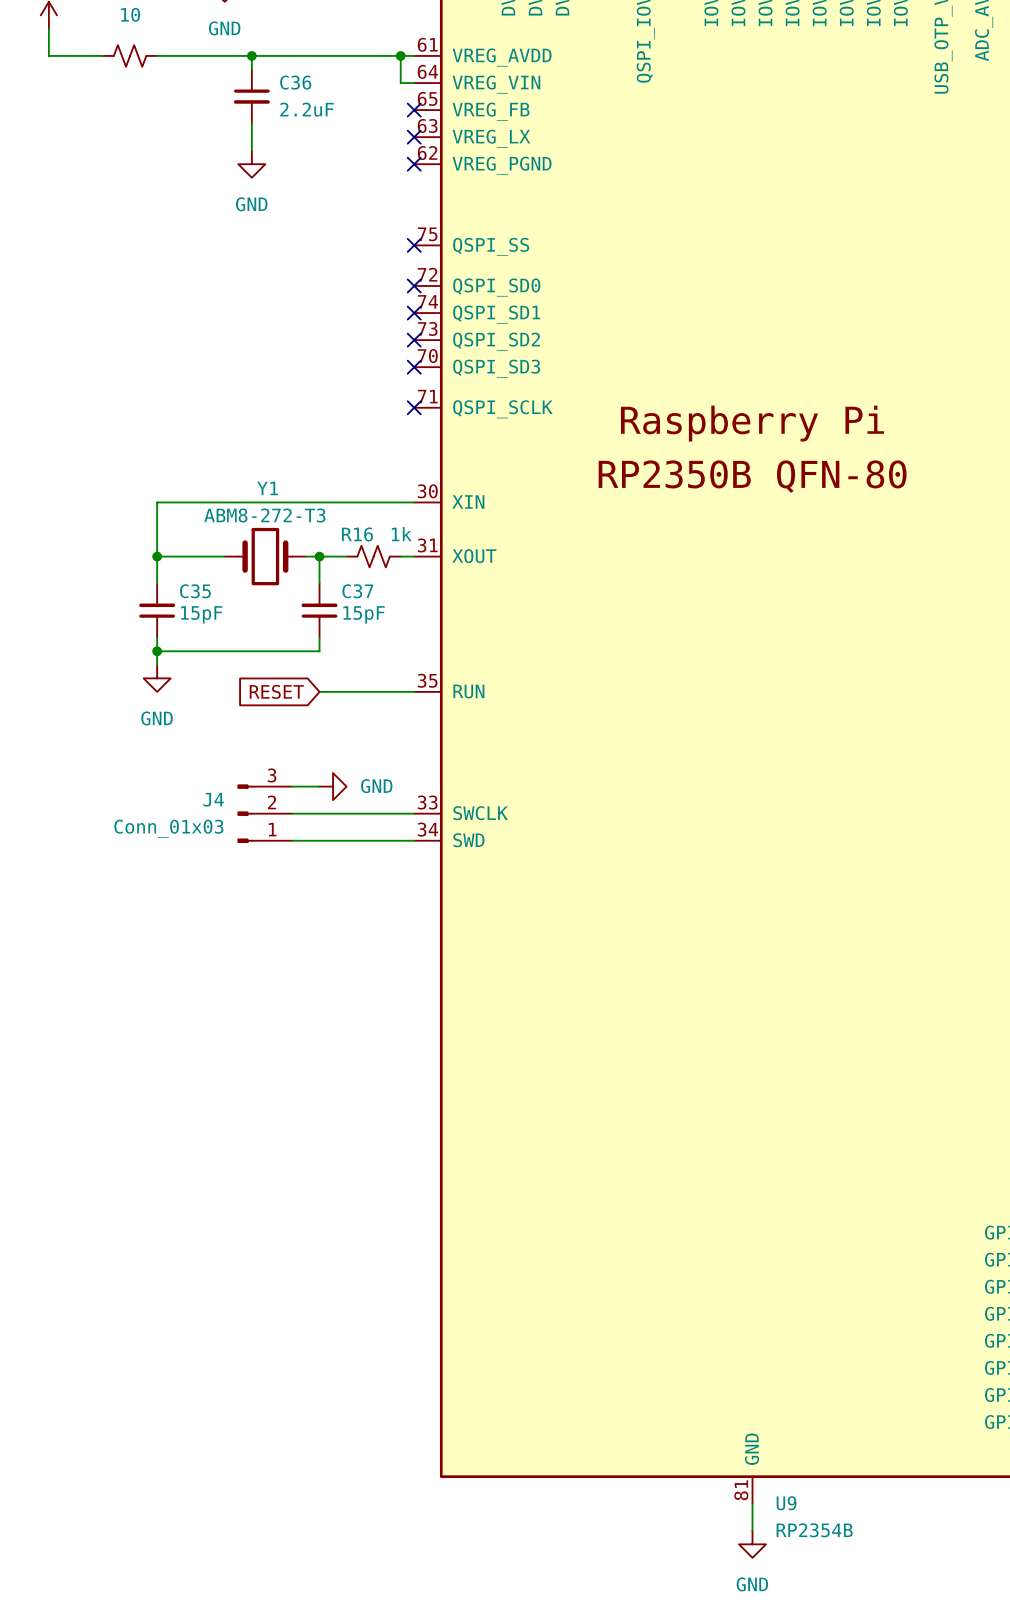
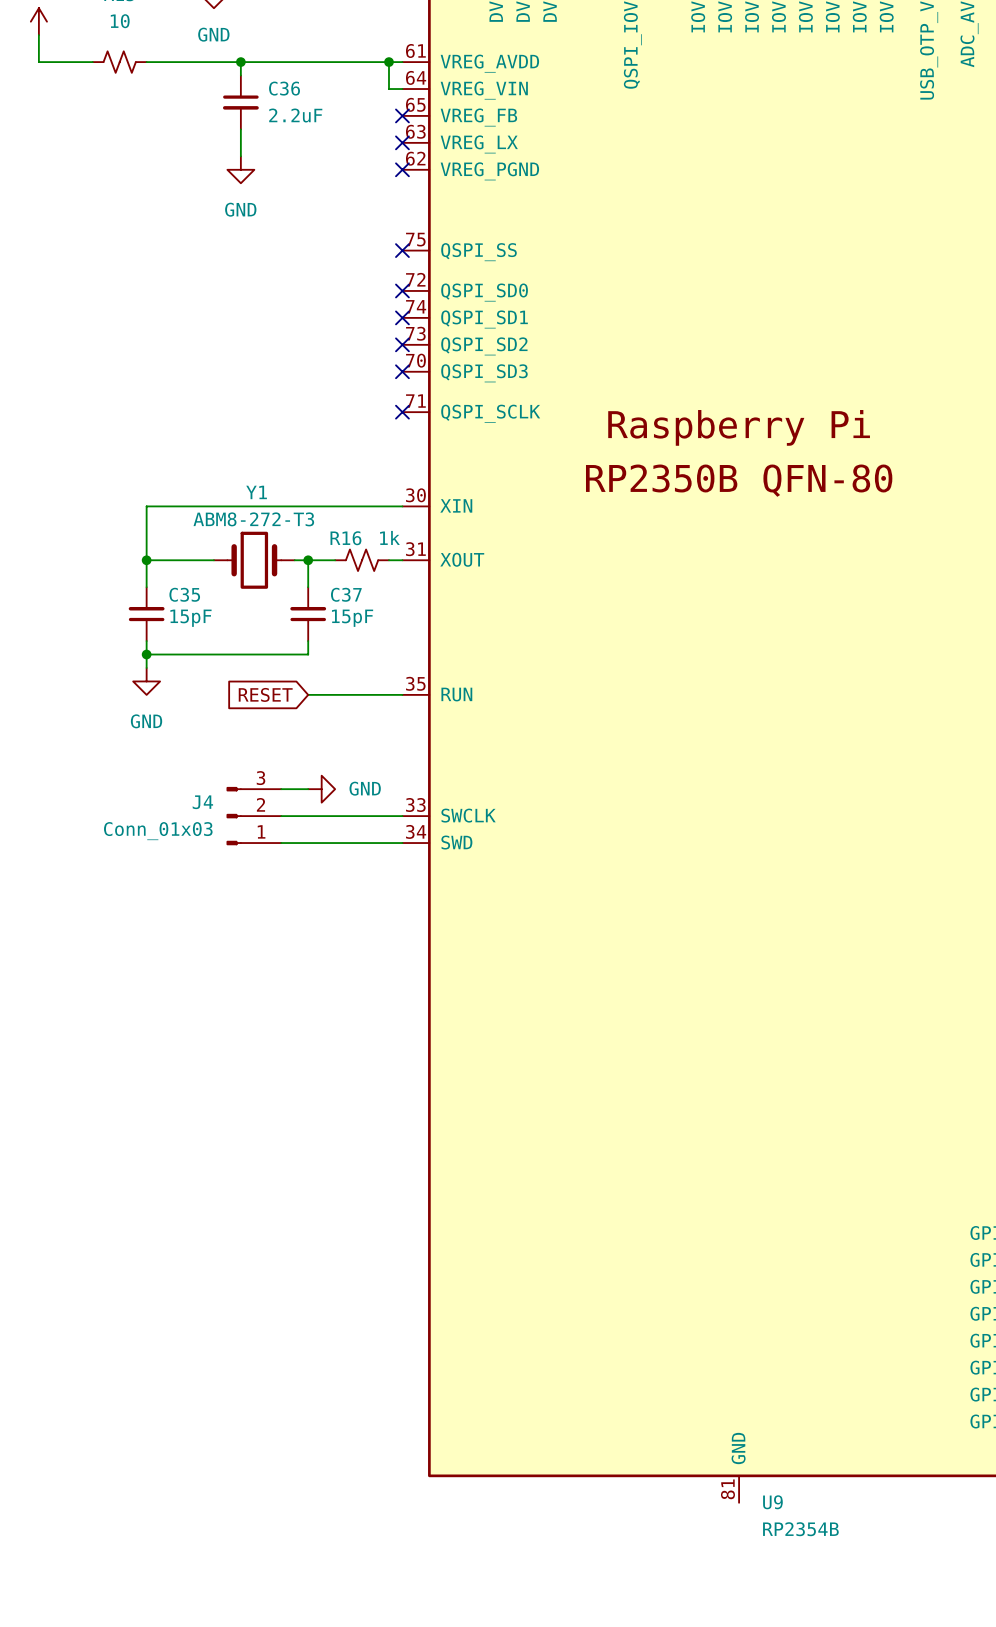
wire: (752, 1503) (752, 1530) -> none
power symbol: GND (752, 1544) -> none

